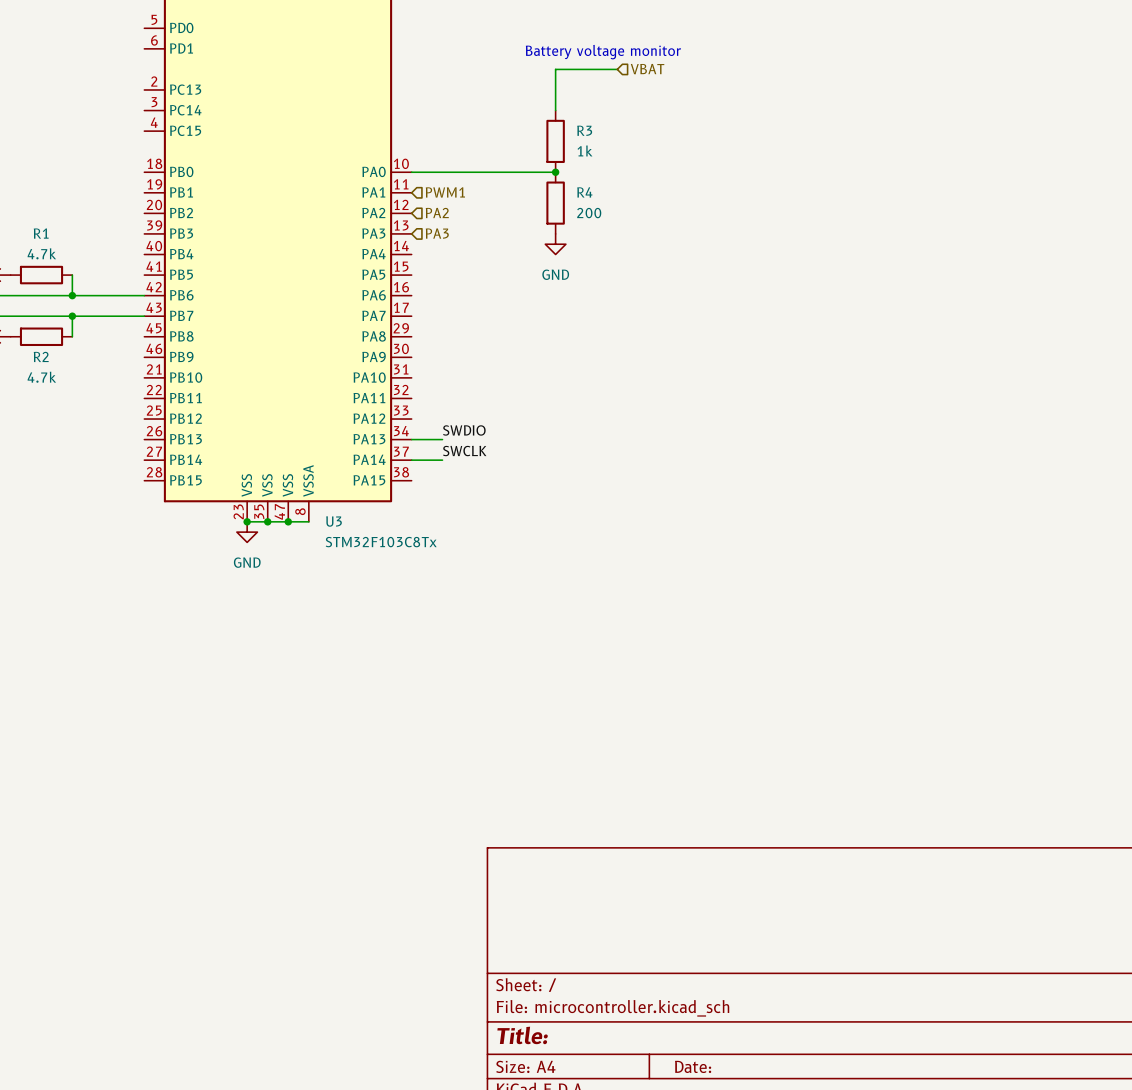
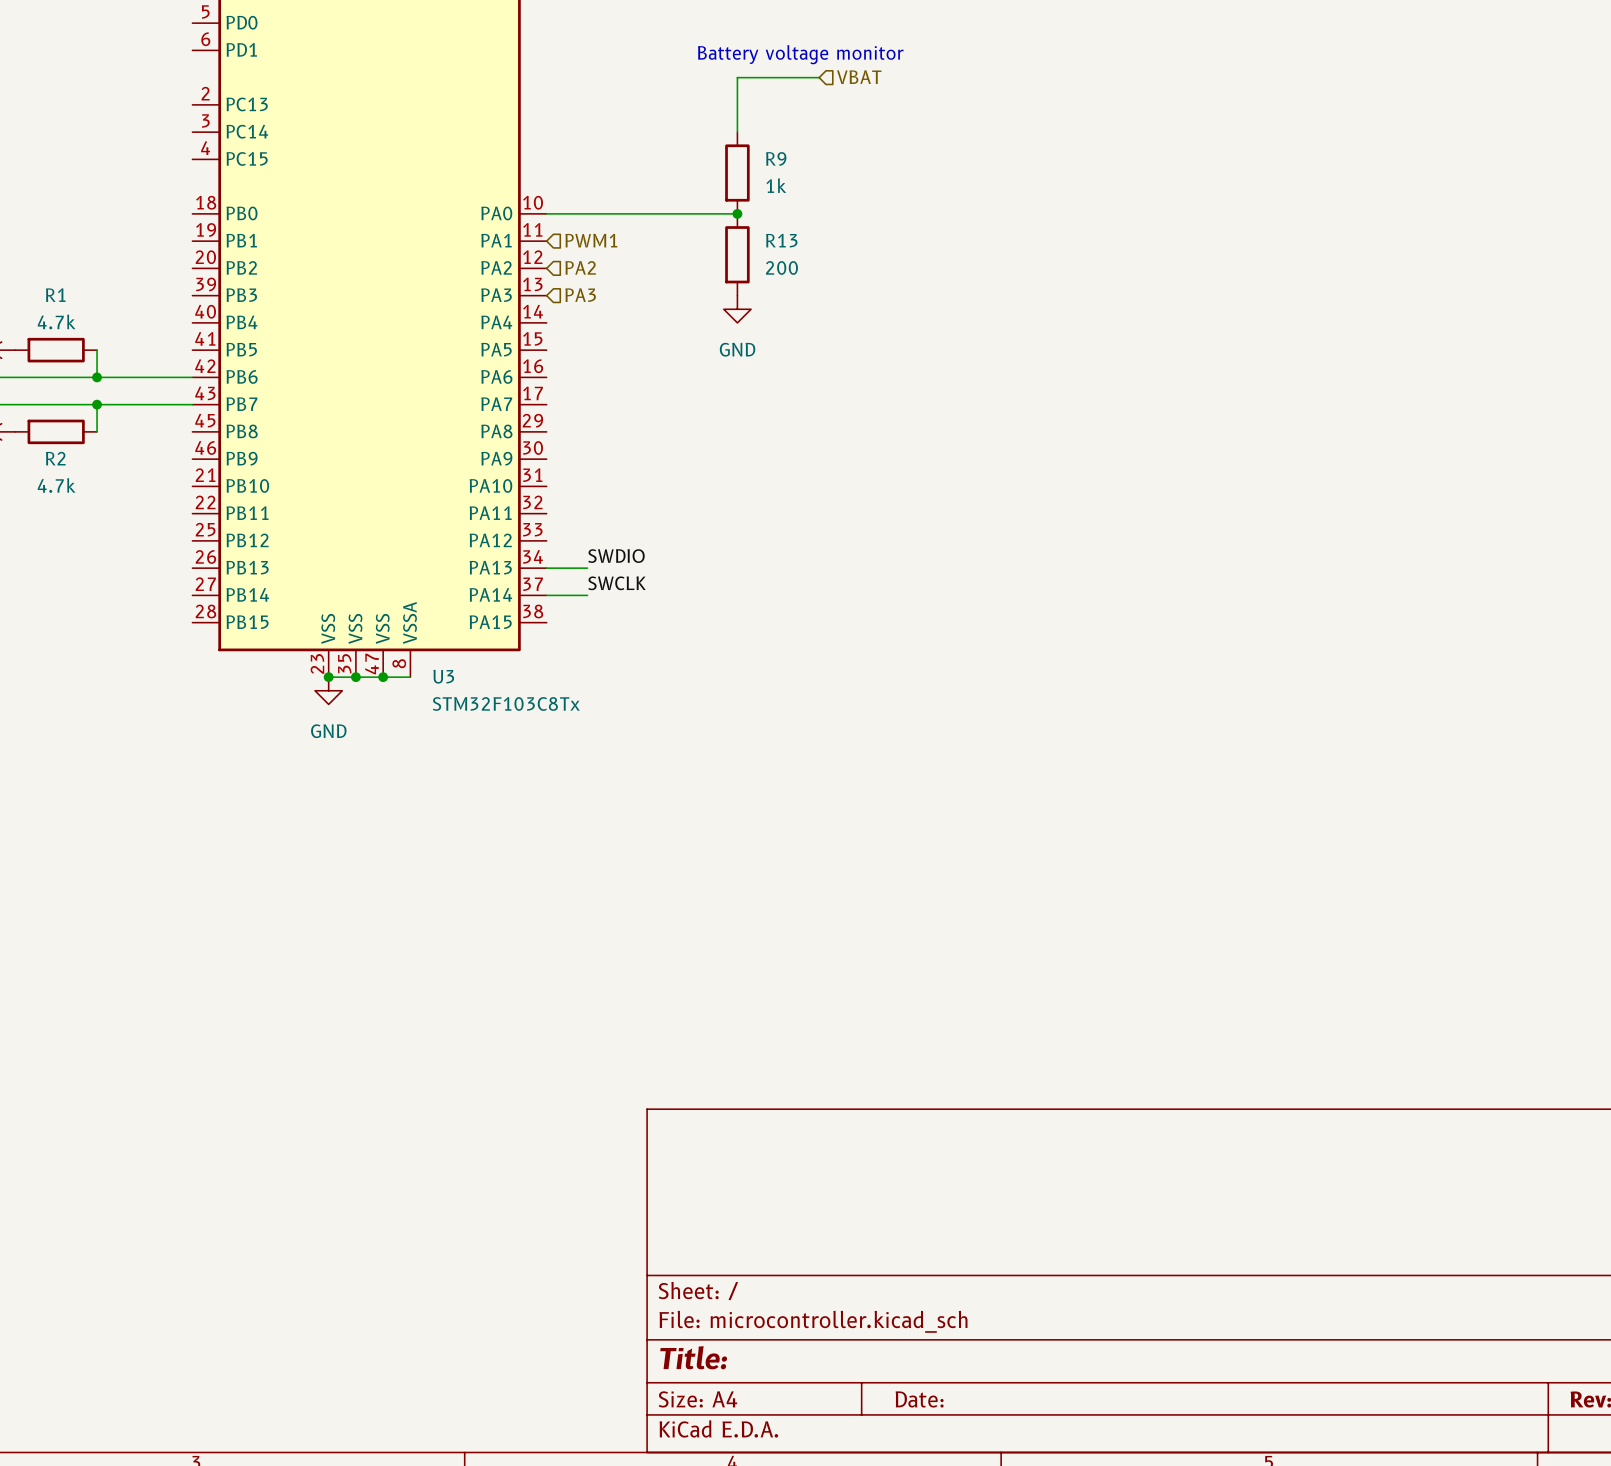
R3 name: R3 (584, 130) -> R9 (776, 158)
R4 name: R4 (584, 192) -> R13 (781, 240)

